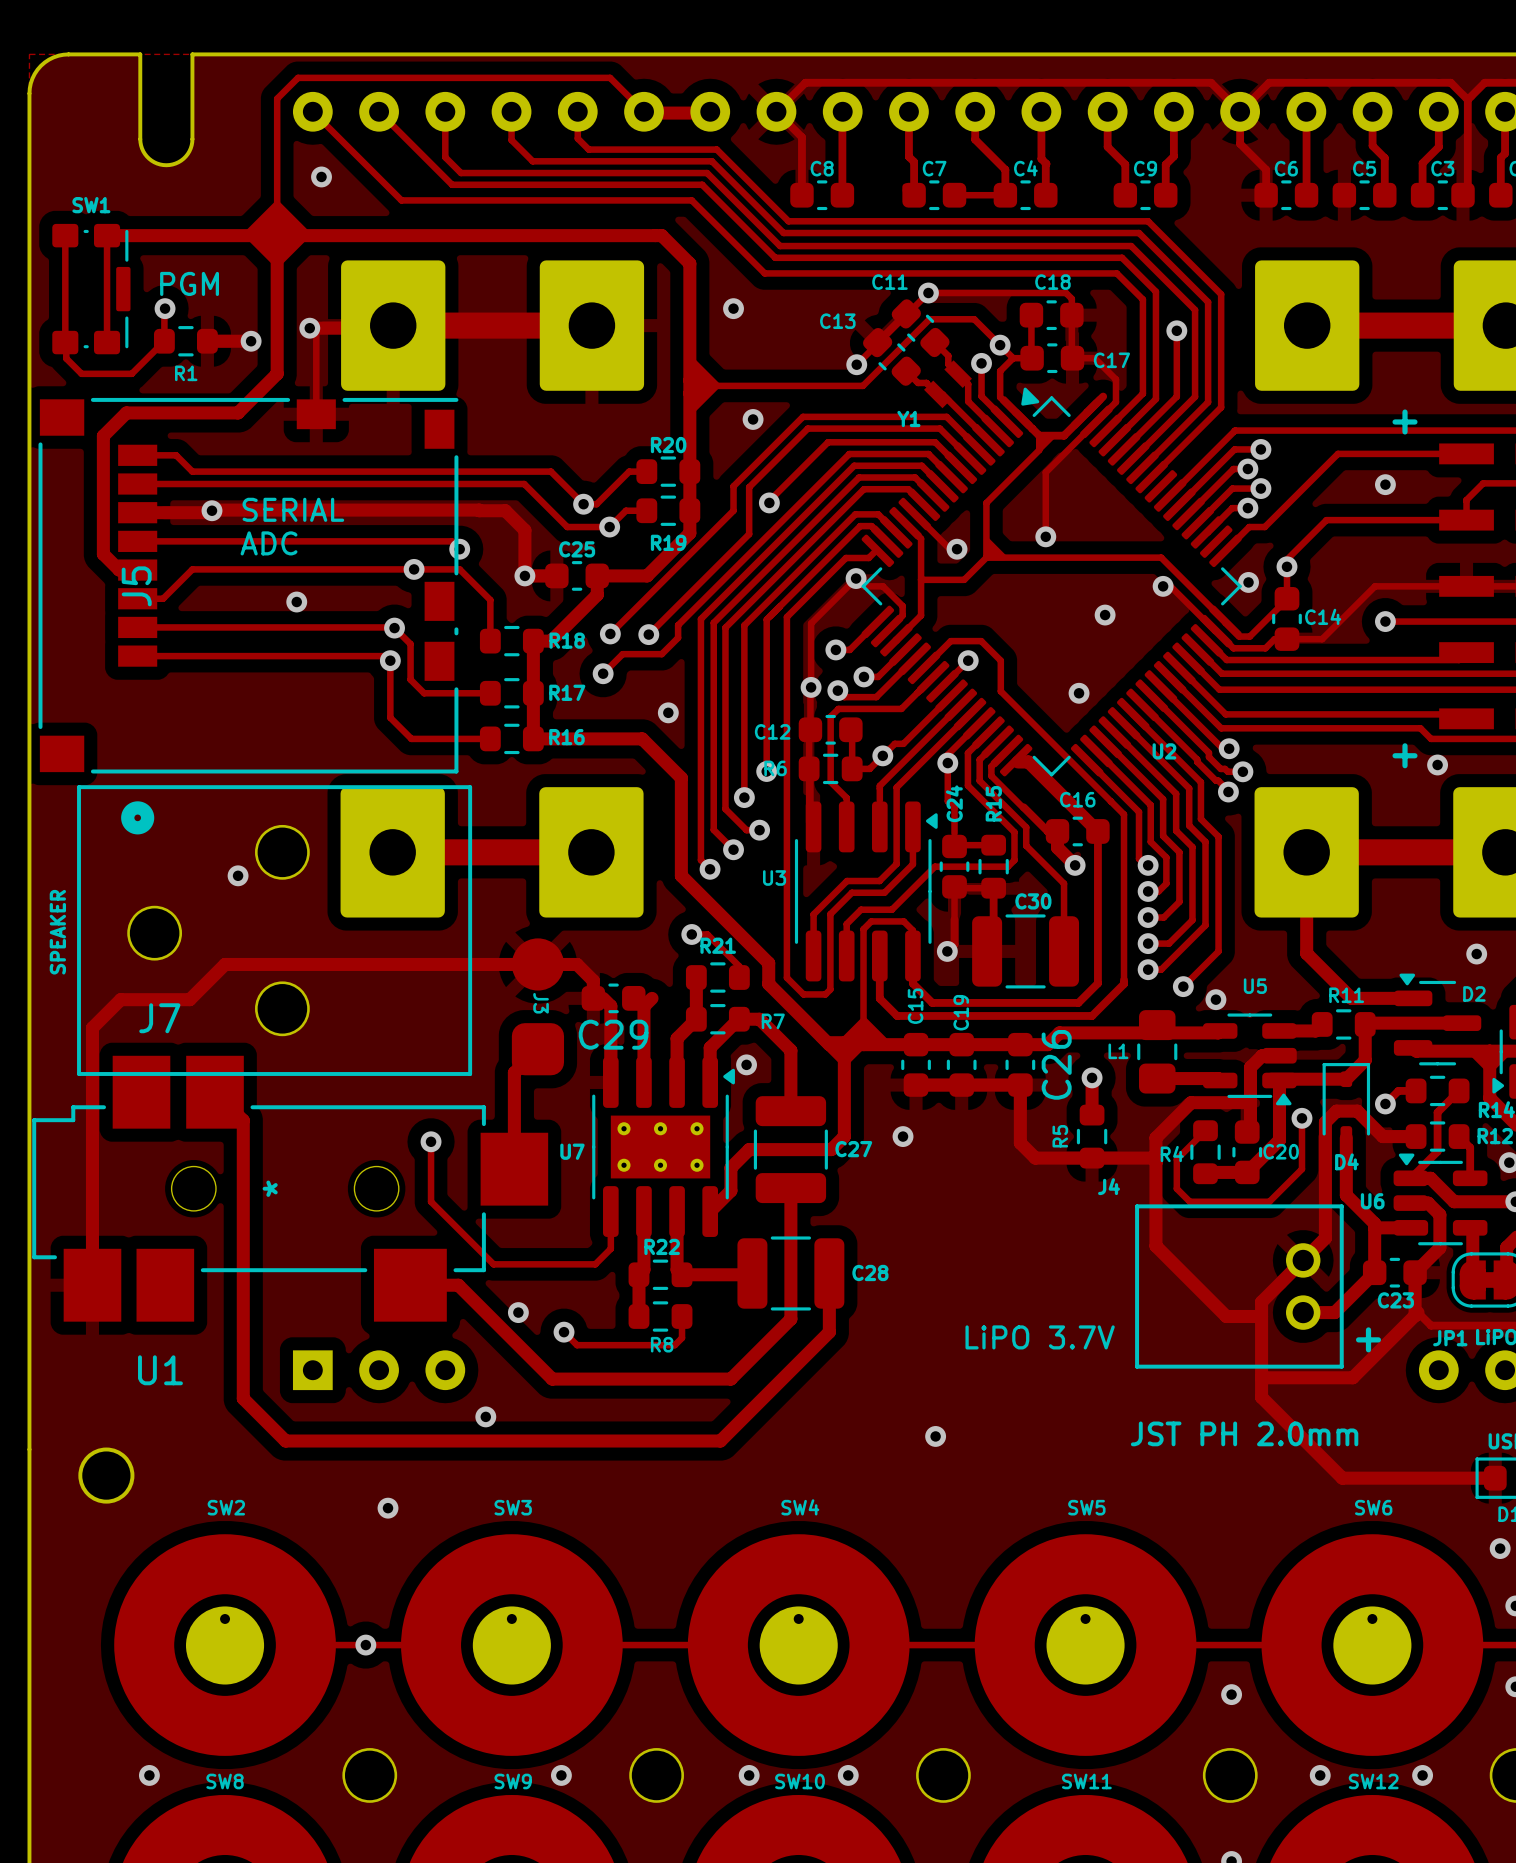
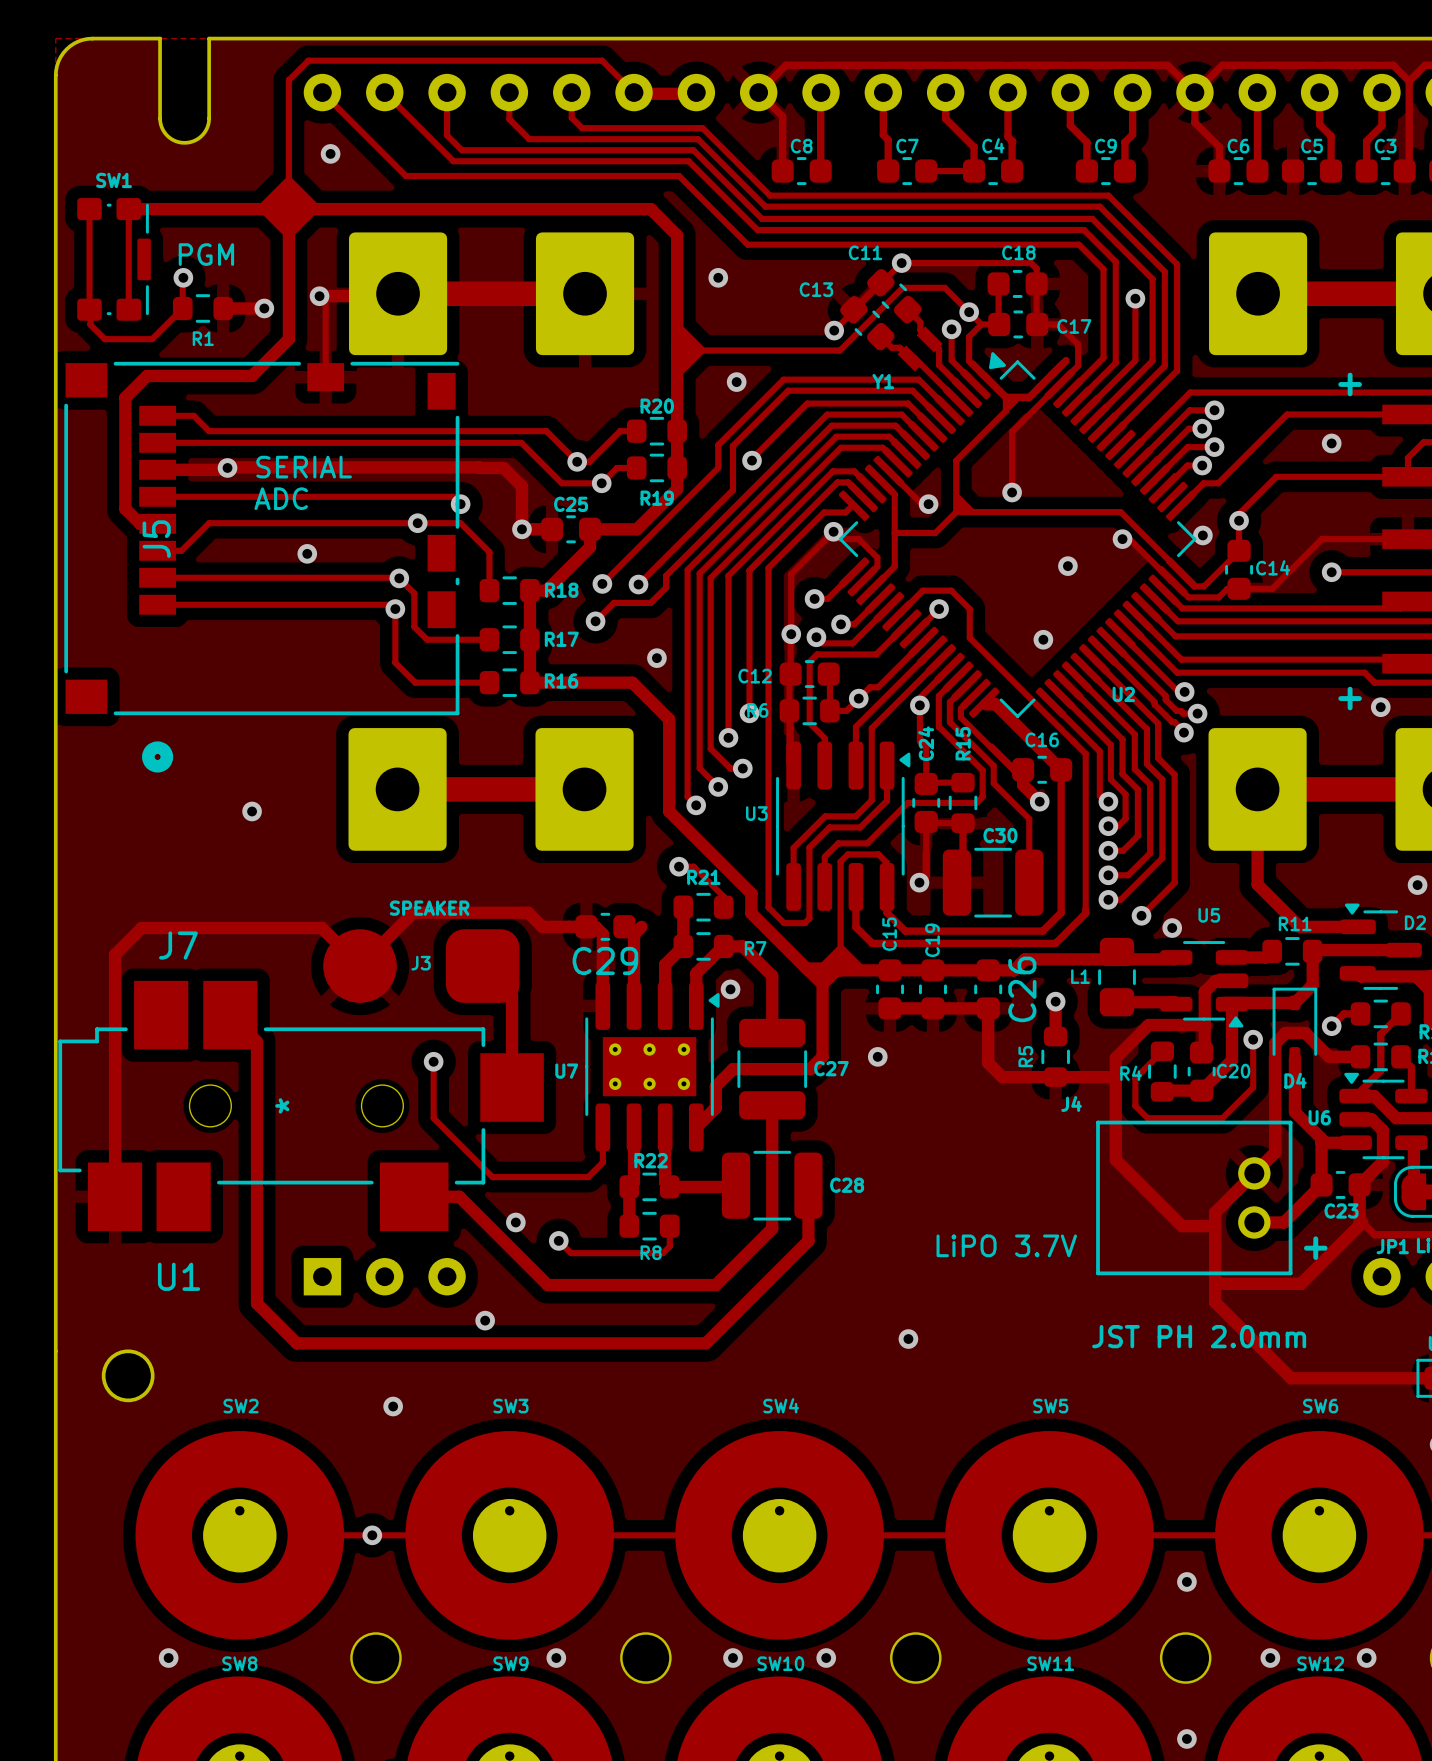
line: (79, 787) (79, 1073) (470, 1073) (470, 787) (79, 787) -> none
round board edge: [255, 824, 310, 880] -> none
round board edge: [127, 905, 183, 961] -> none
text rotation: 0° (57, 932) -> 90° clockwise (429, 908)
text position: SPEAKER (57, 932) -> SPEAKER (429, 908)
J3 footprint: [511, 938, 565, 1076] -> [323, 929, 520, 1003]
round board edge: [255, 981, 310, 1037] -> none
track: (593, 998) (593, 980) (577, 964) (225, 964) (189, 999) -> (595, 926) (542, 926) (528, 912) (413, 912) (360, 966) (322, 928) (206, 928)

